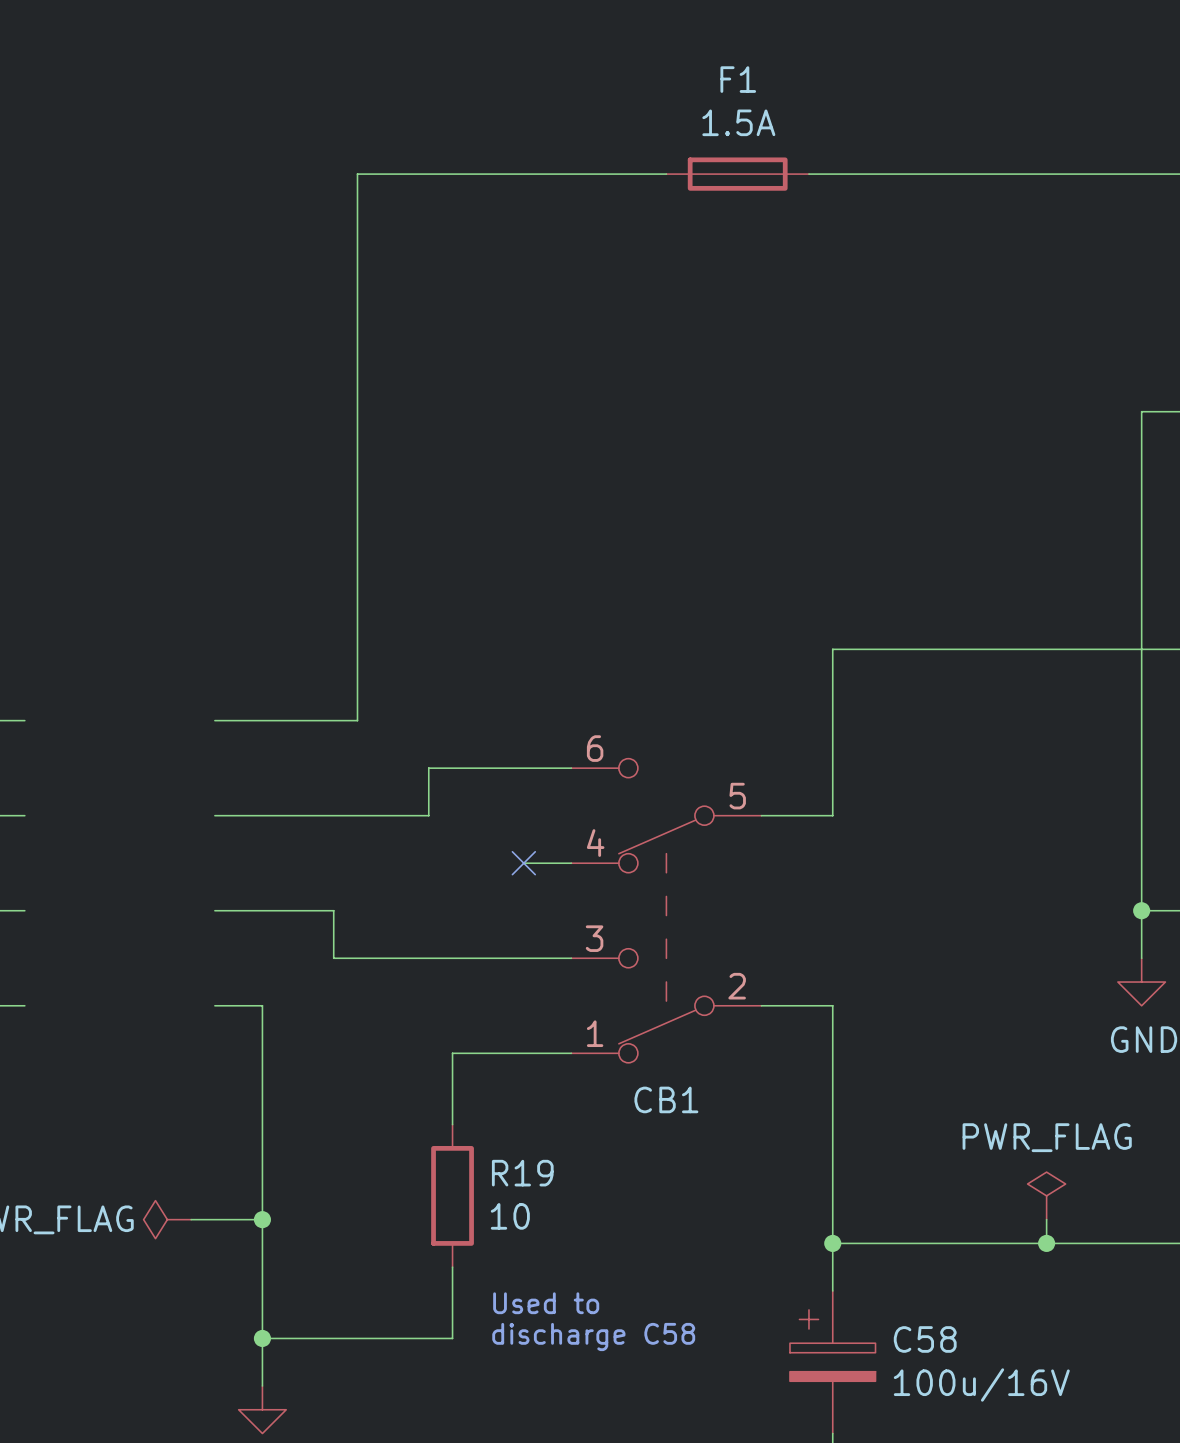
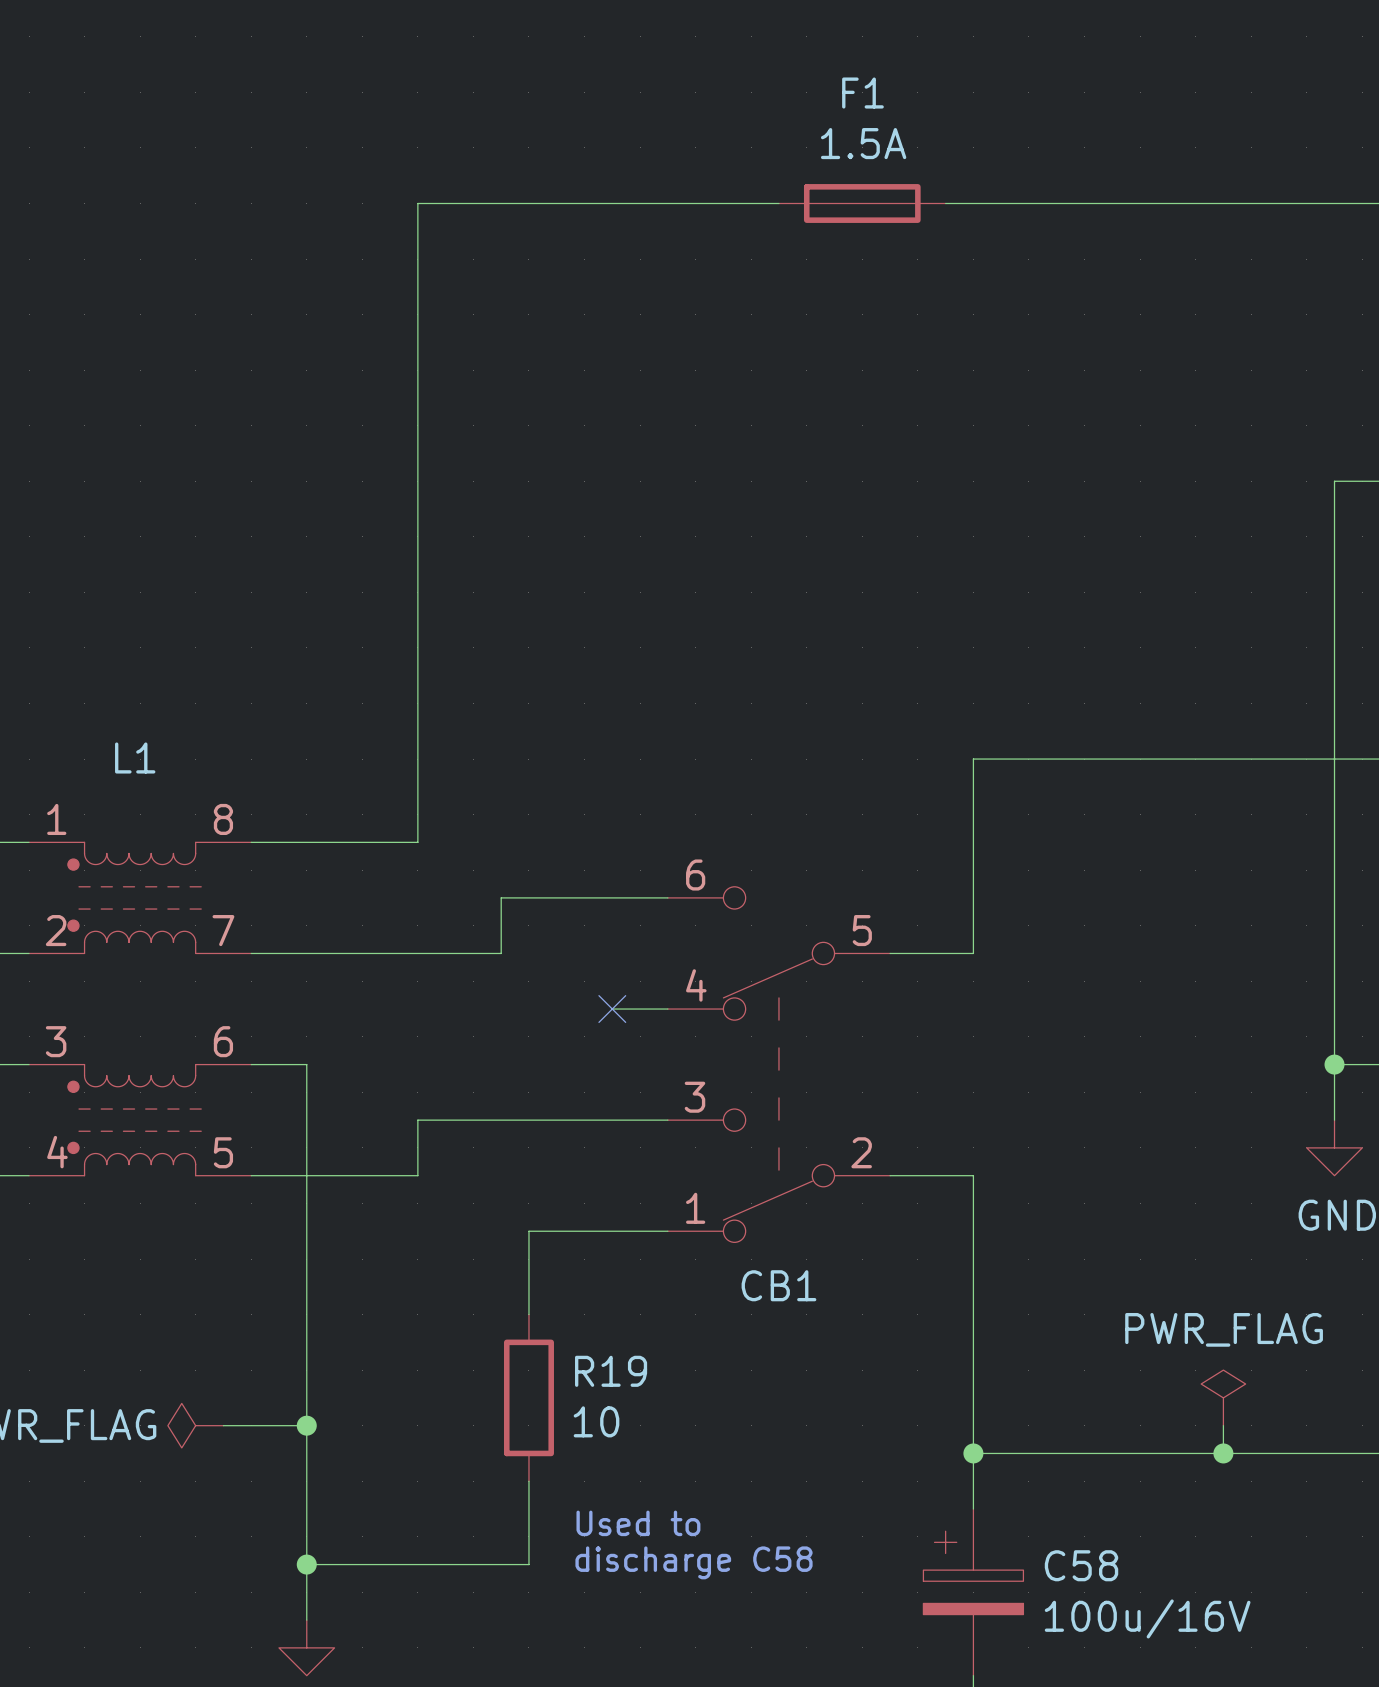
L1: none -> (140, 1009)
wire: (262, 910) (333, 910) (333, 958) (357, 958) -> (306, 1064) (306, 1175) (417, 1175) (417, 1120)

